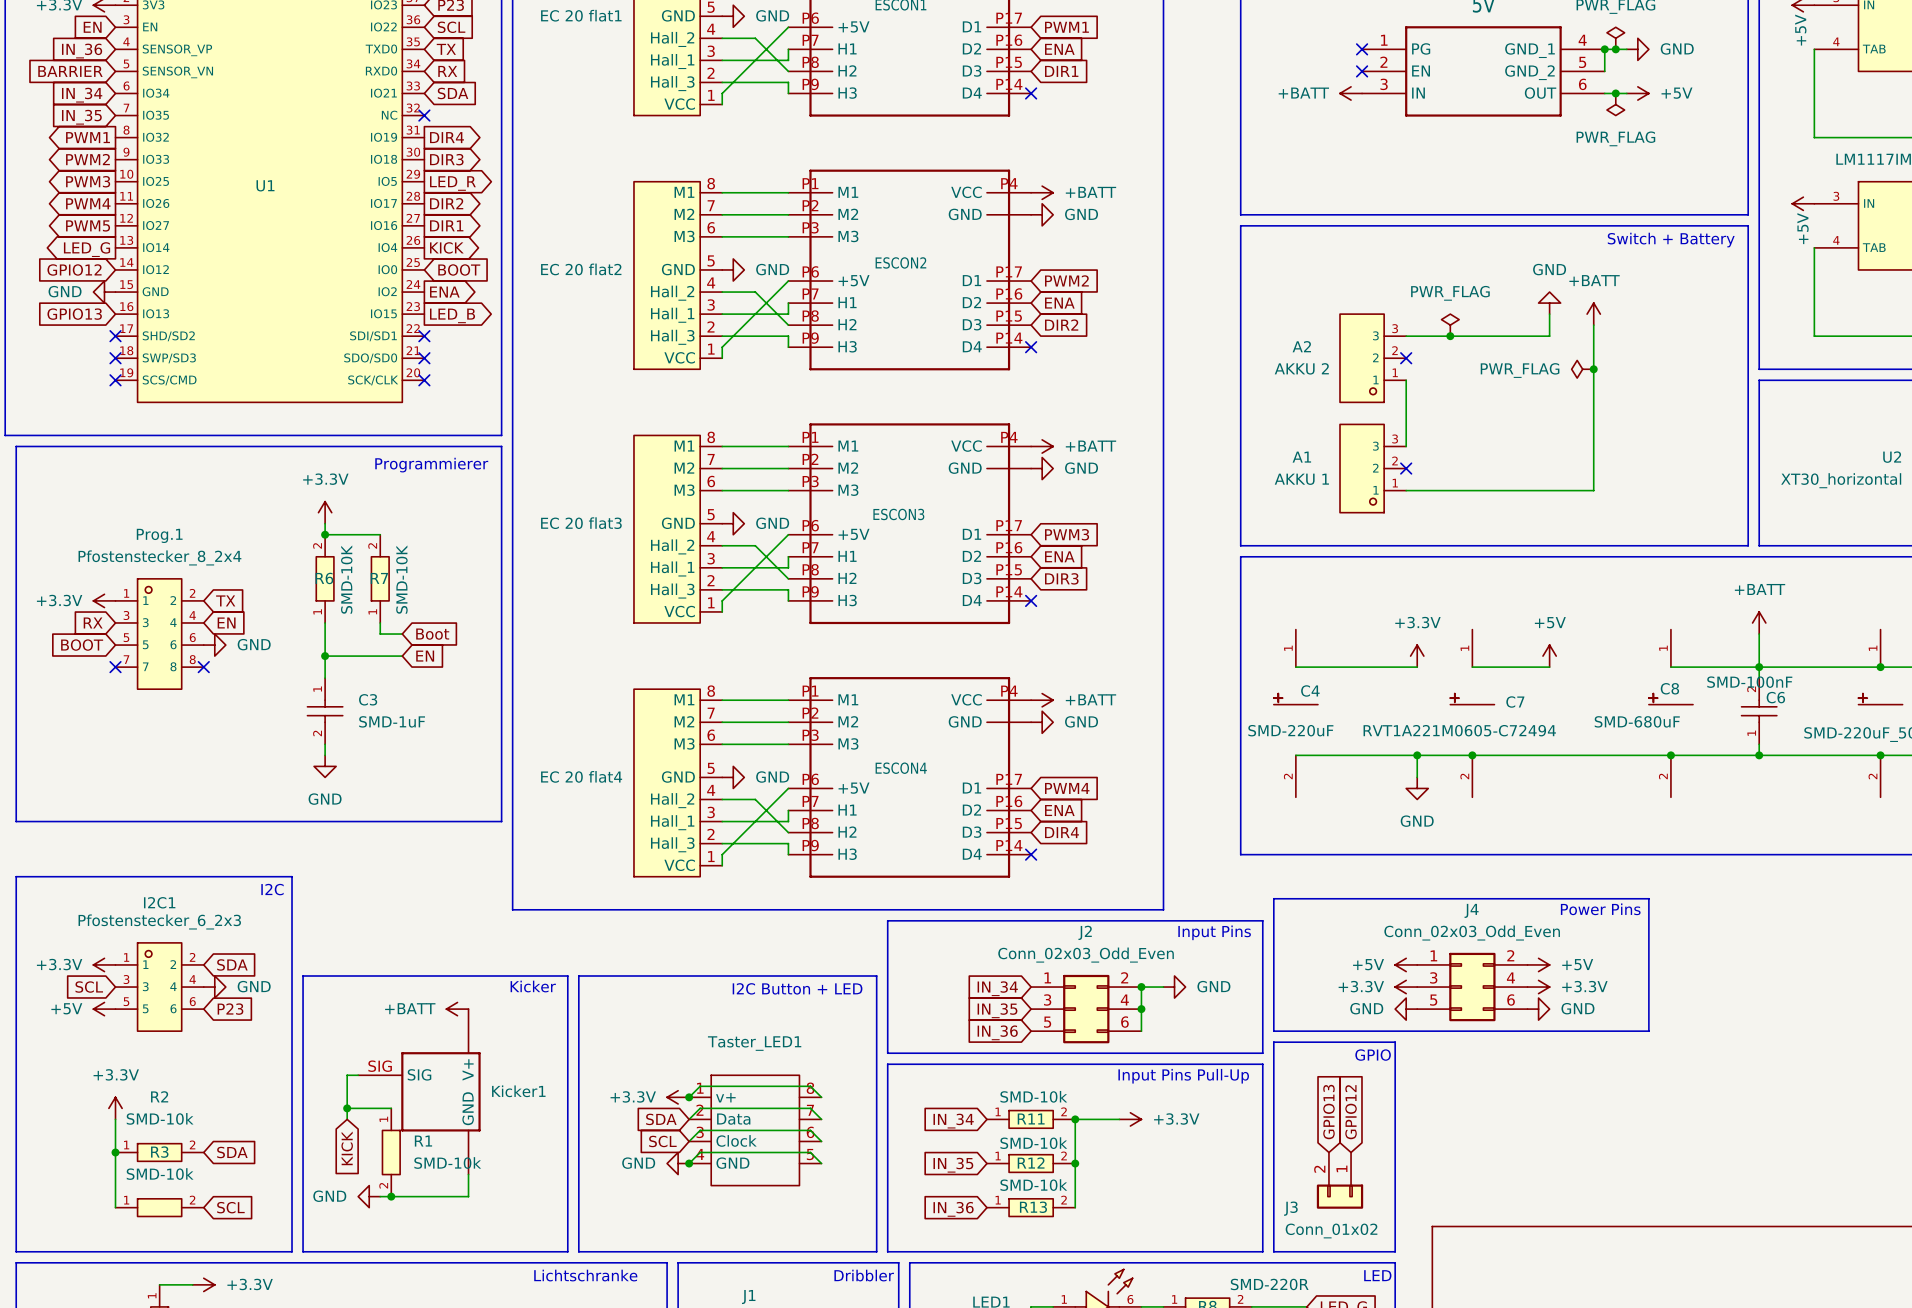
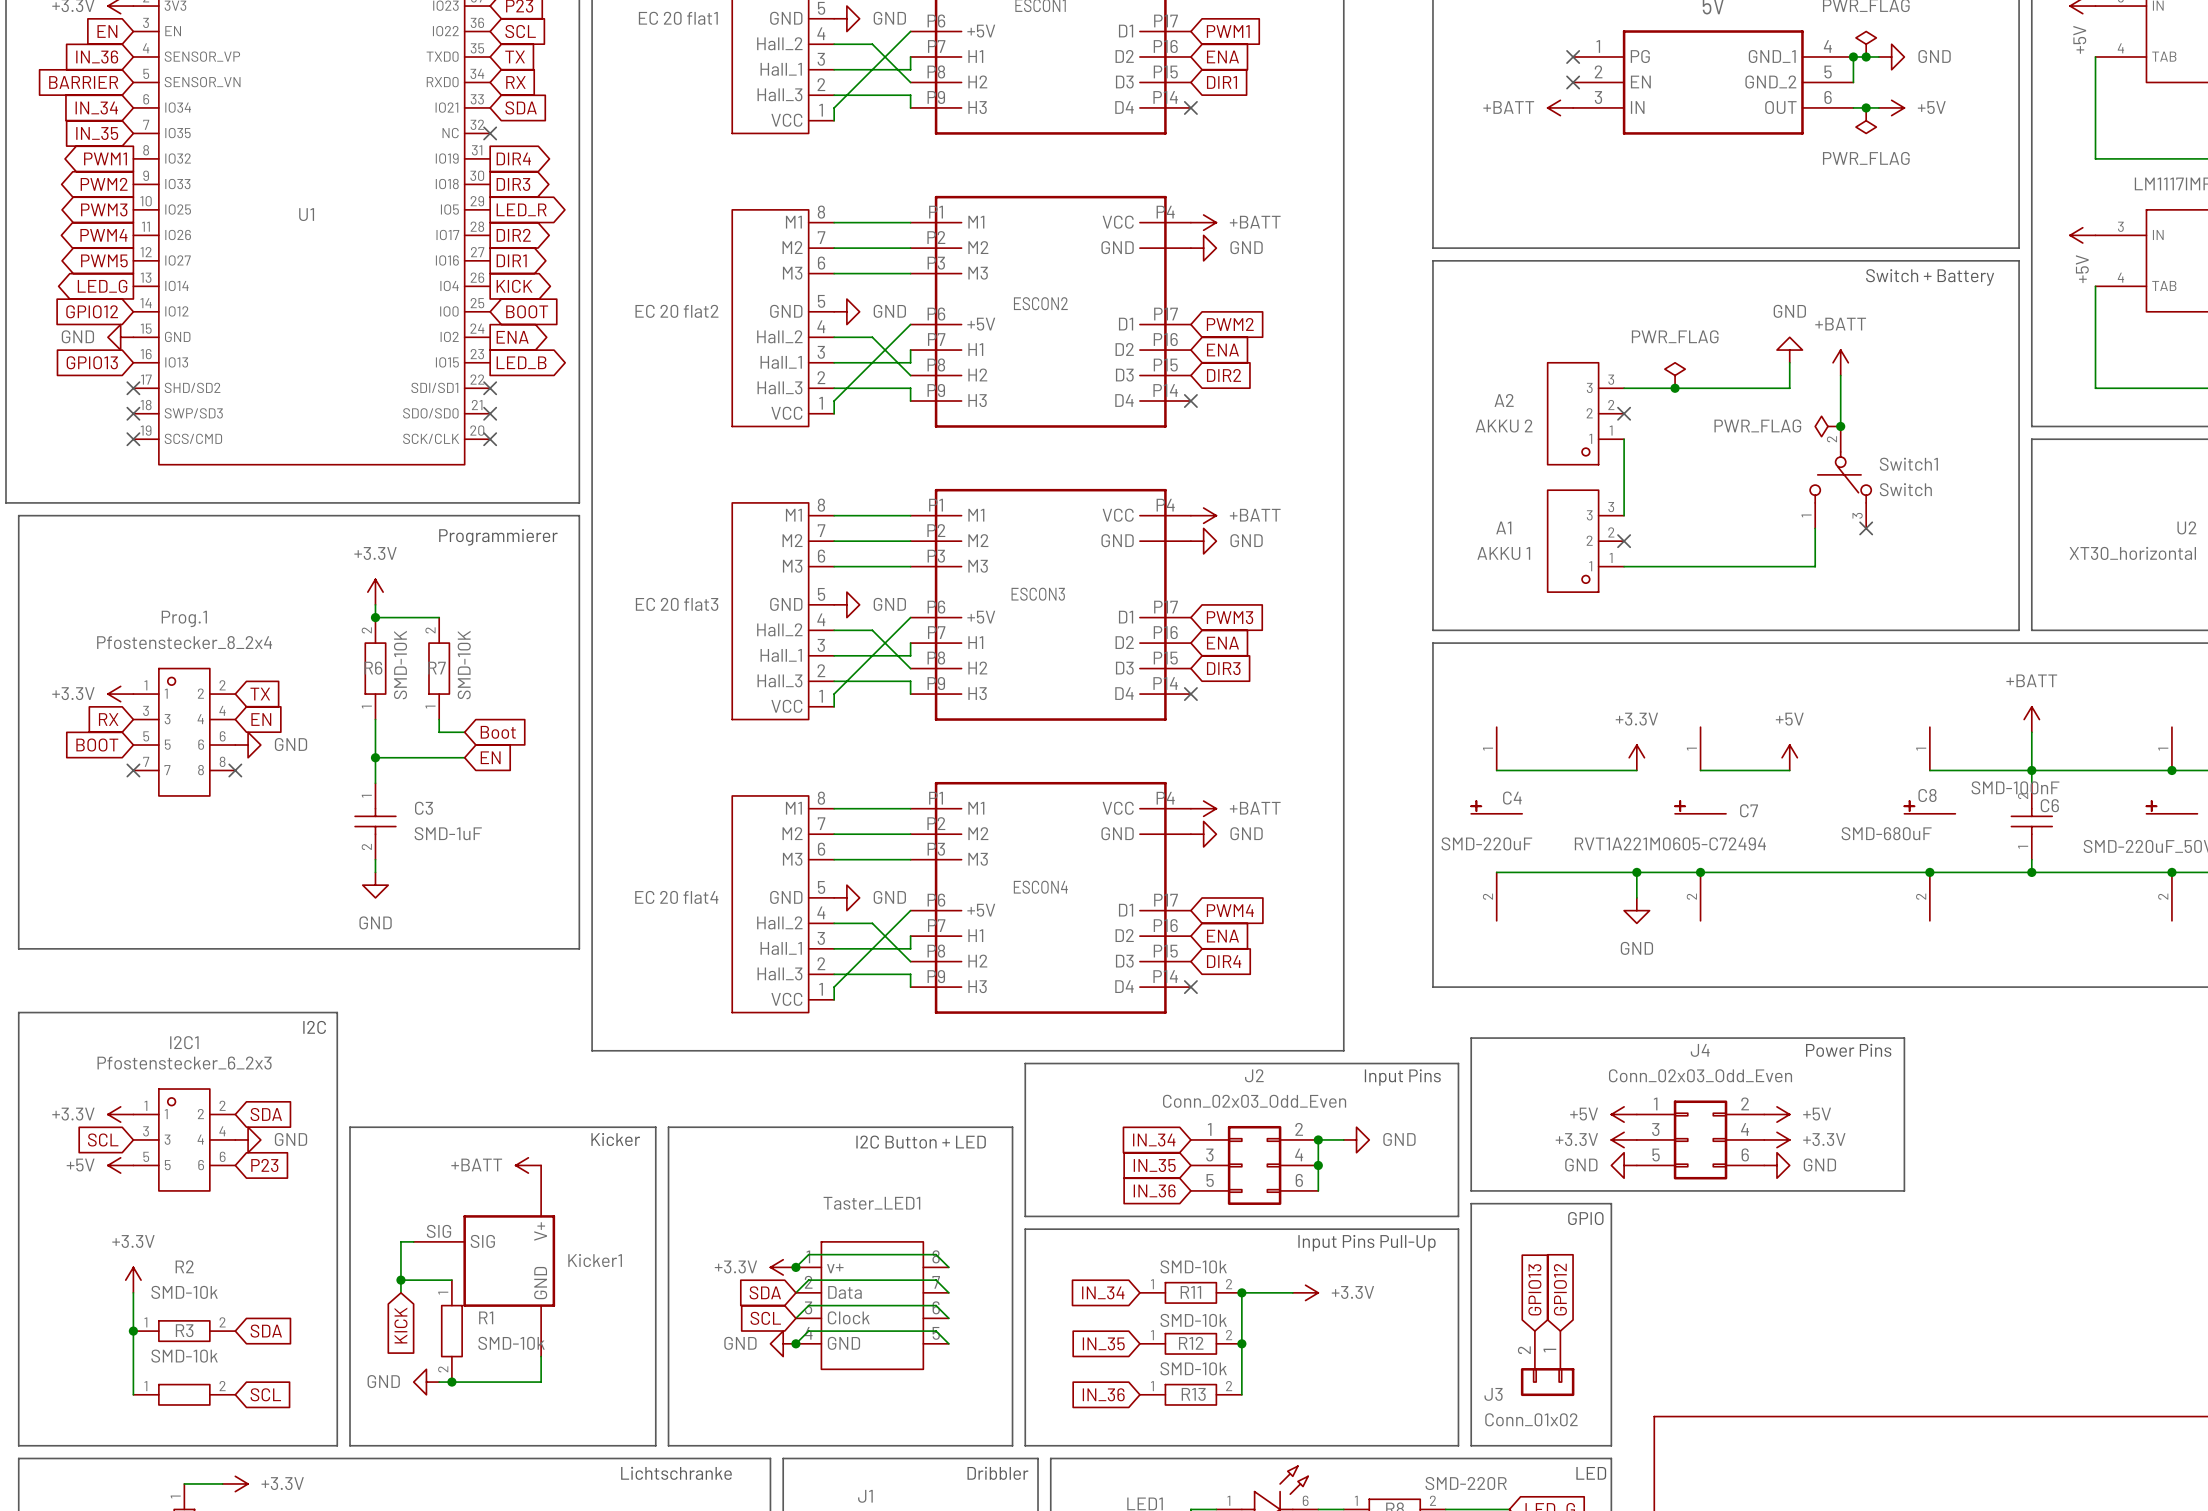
wire: (1593, 369) (1593, 490) (1571, 490) -> (1815, 528) (1815, 566)
Switch1: none -> Switch (1840, 477)
no-connect mark: none -> (1866, 528)

